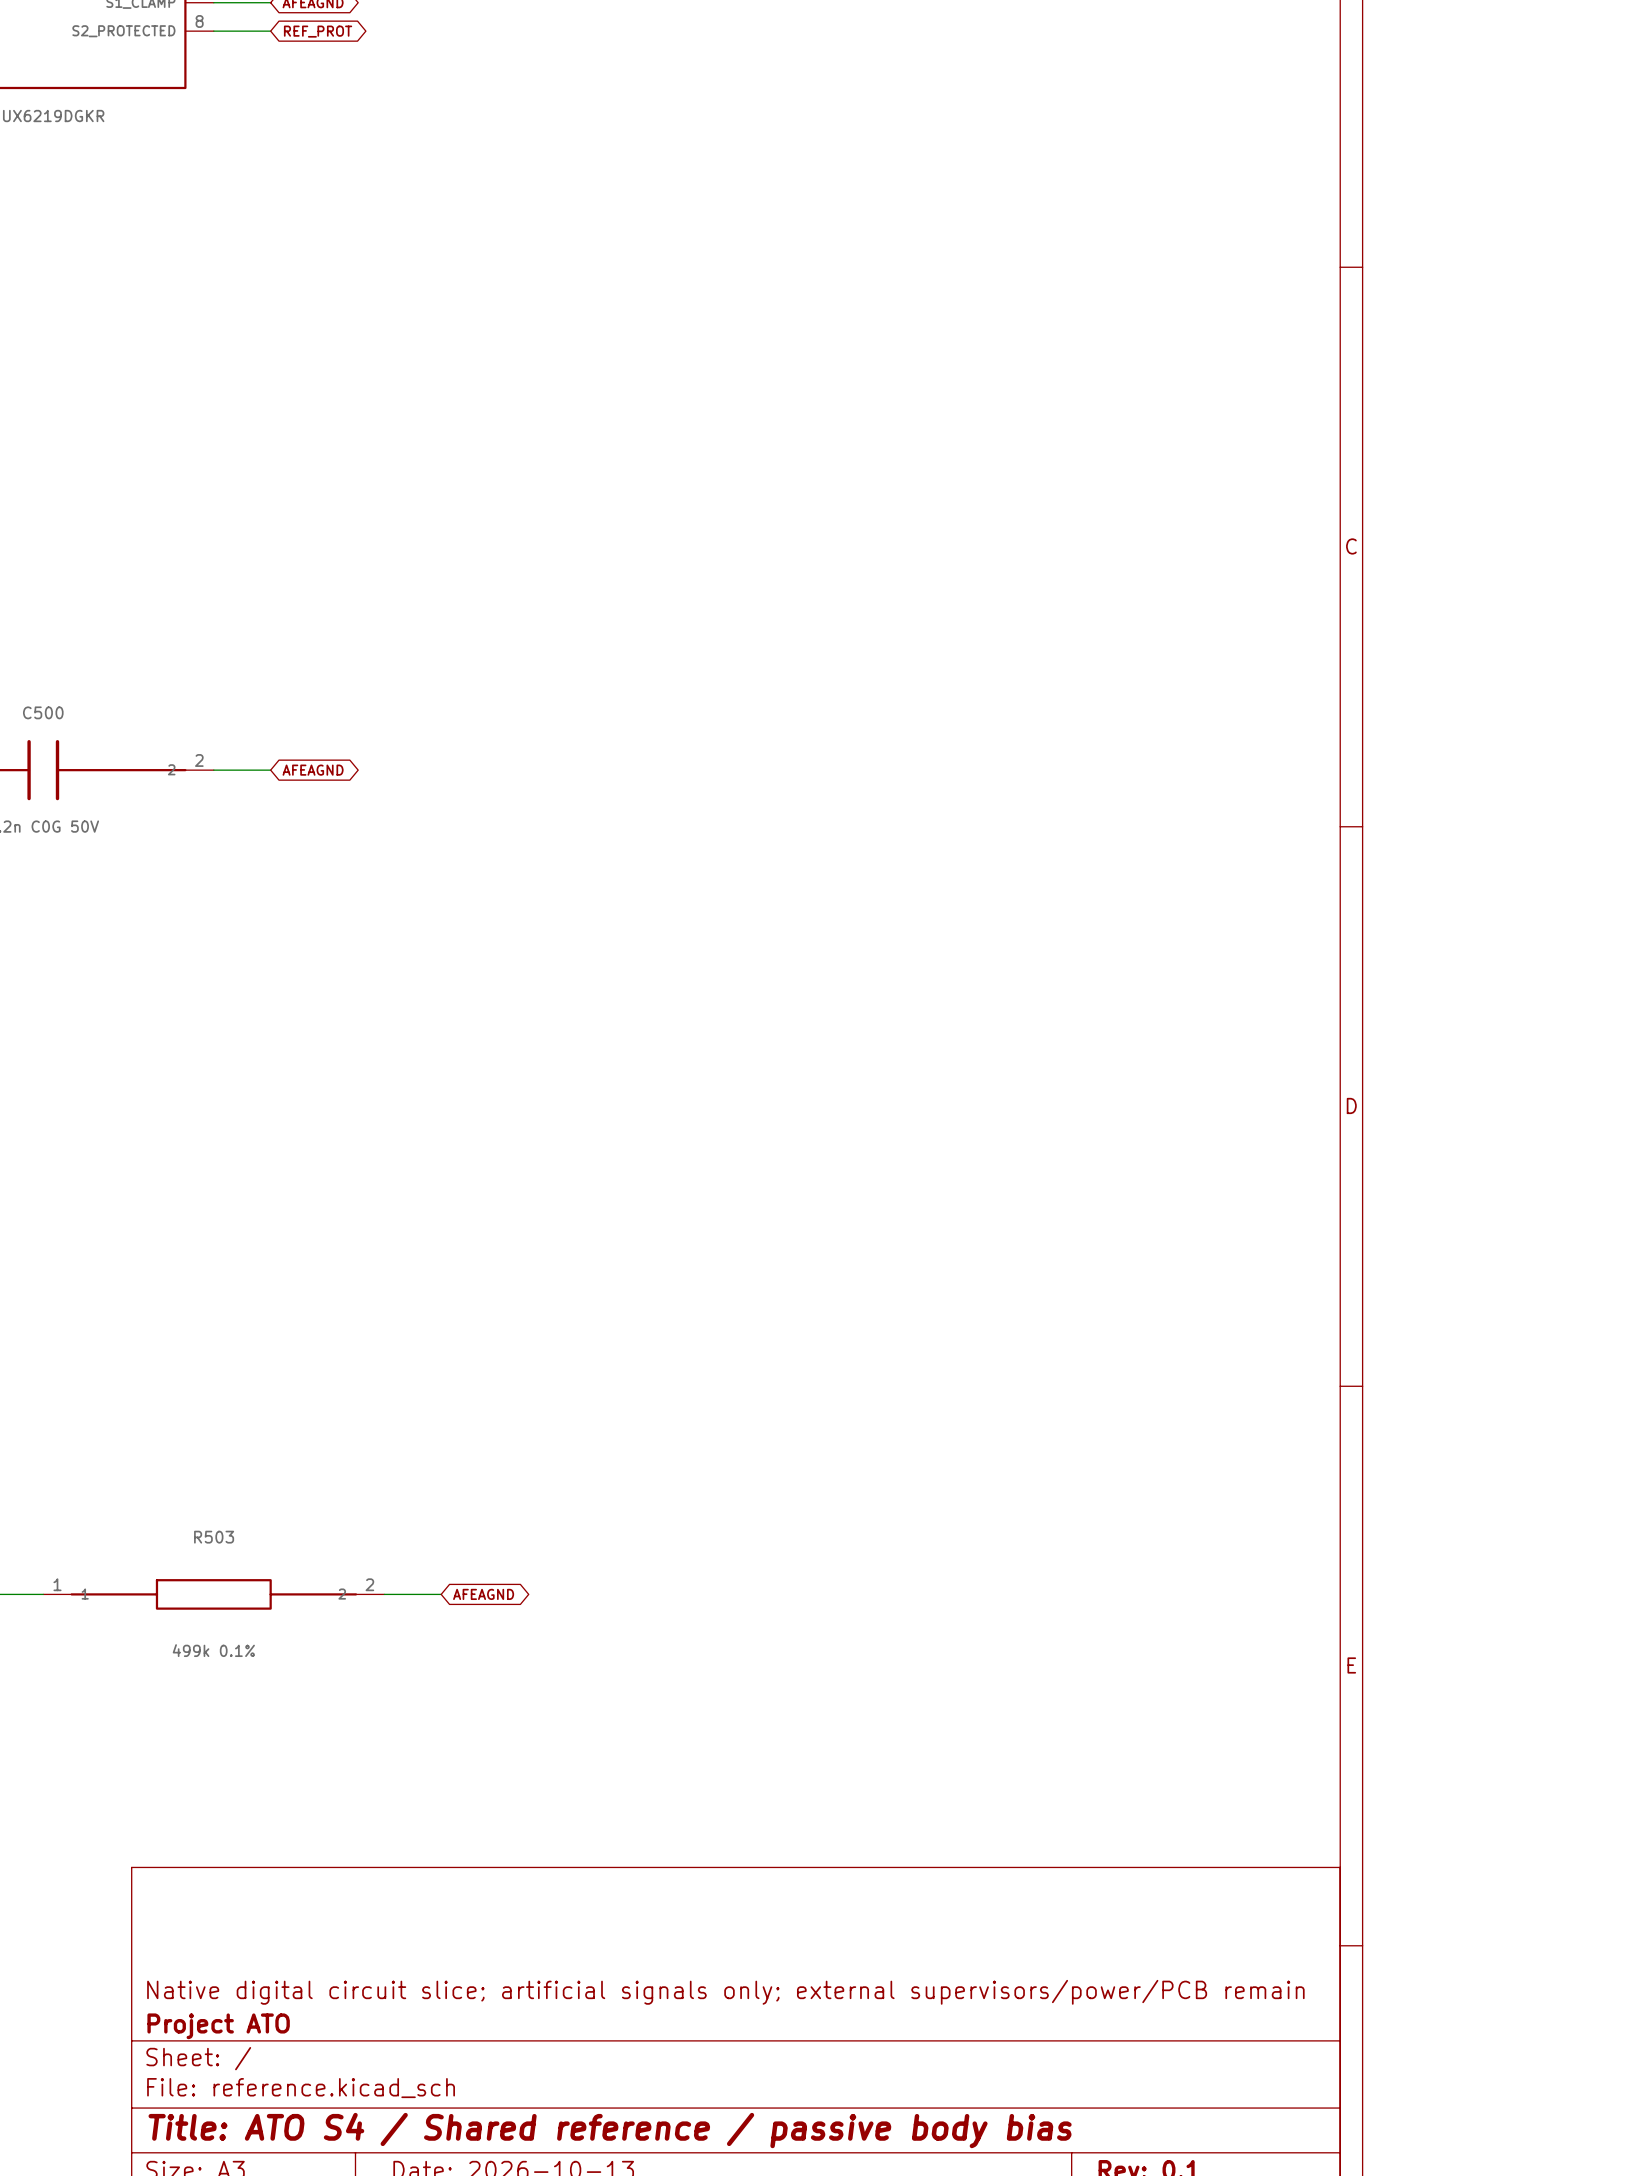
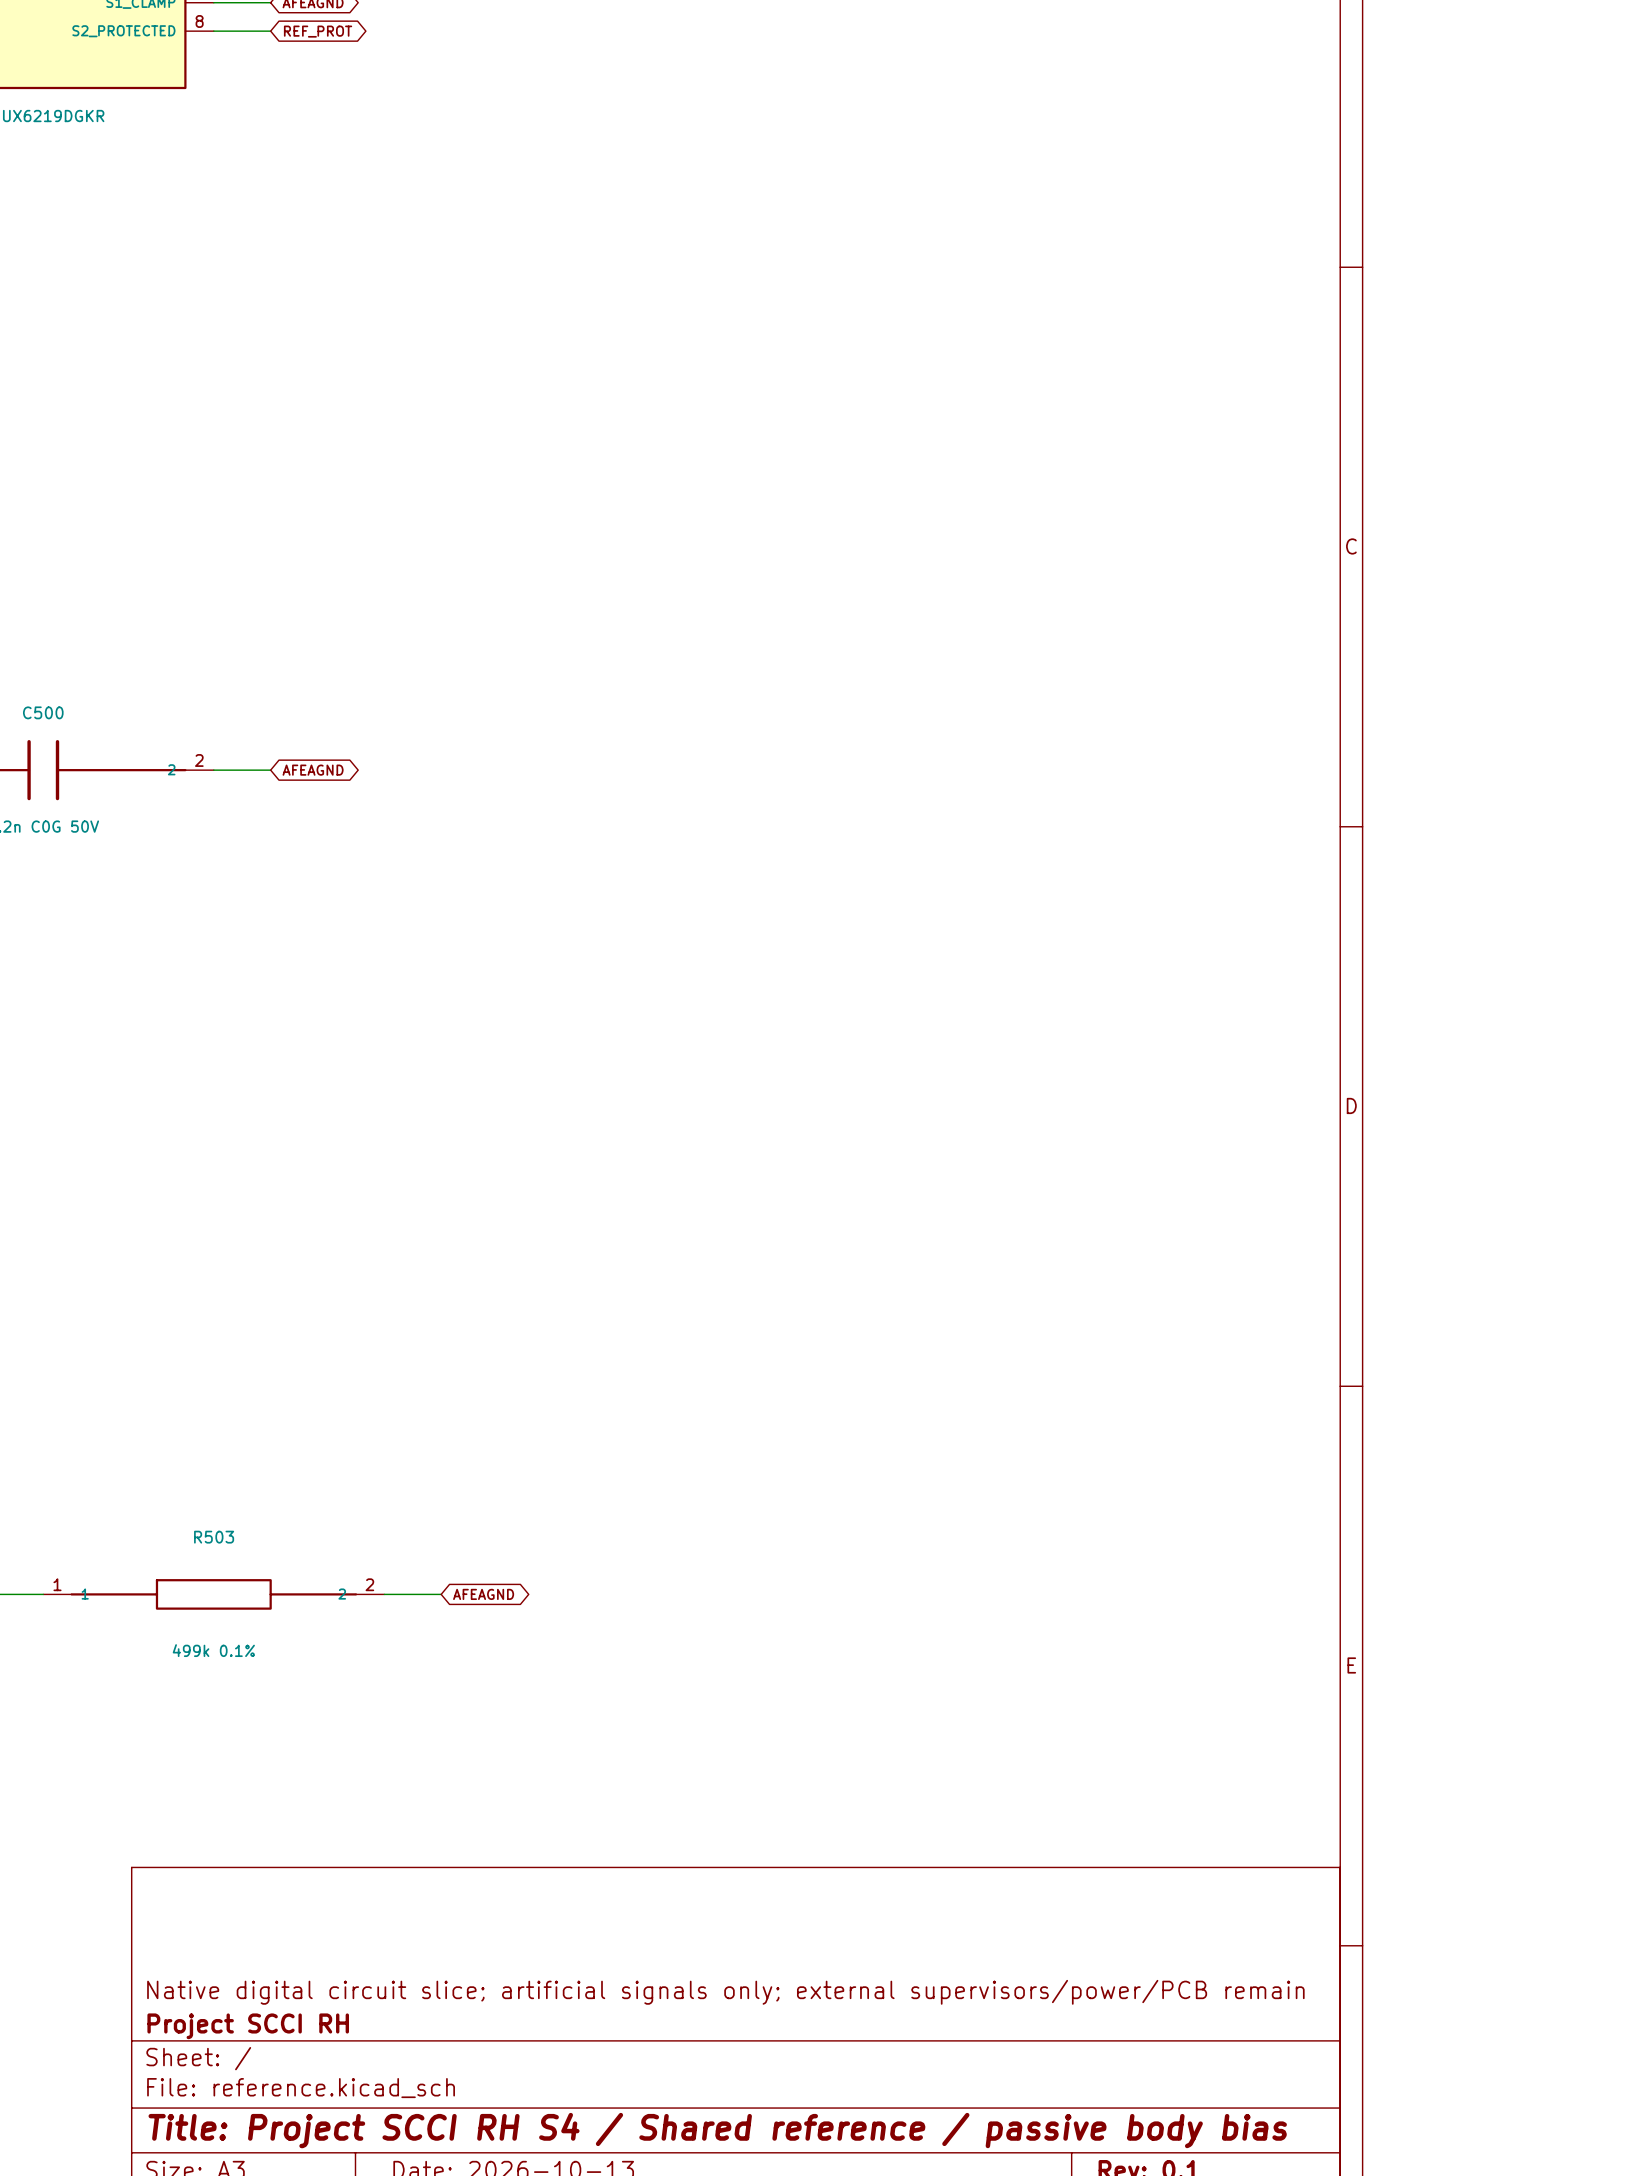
title block: Project ATO (218, 2026) -> Project SCCI RH (248, 2026)
title block: Title: ATO S4 / Shared reference / passive body bias (610, 2130) -> Title: Project SCCI RH S4 / Shared reference / passive body bias (717, 2130)

